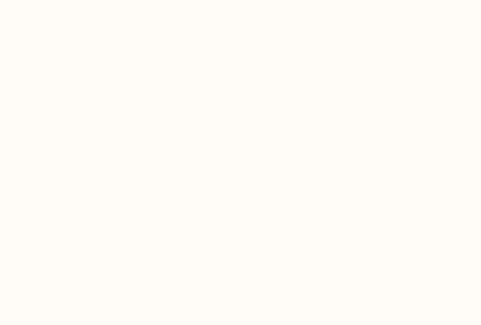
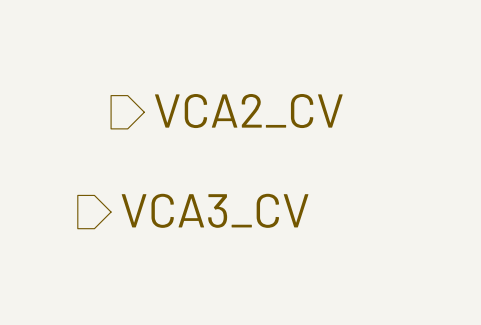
hierarchical label: none -> VCA2_CV (248, 111)
hierarchical label: none -> VCA3_CV (215, 210)

